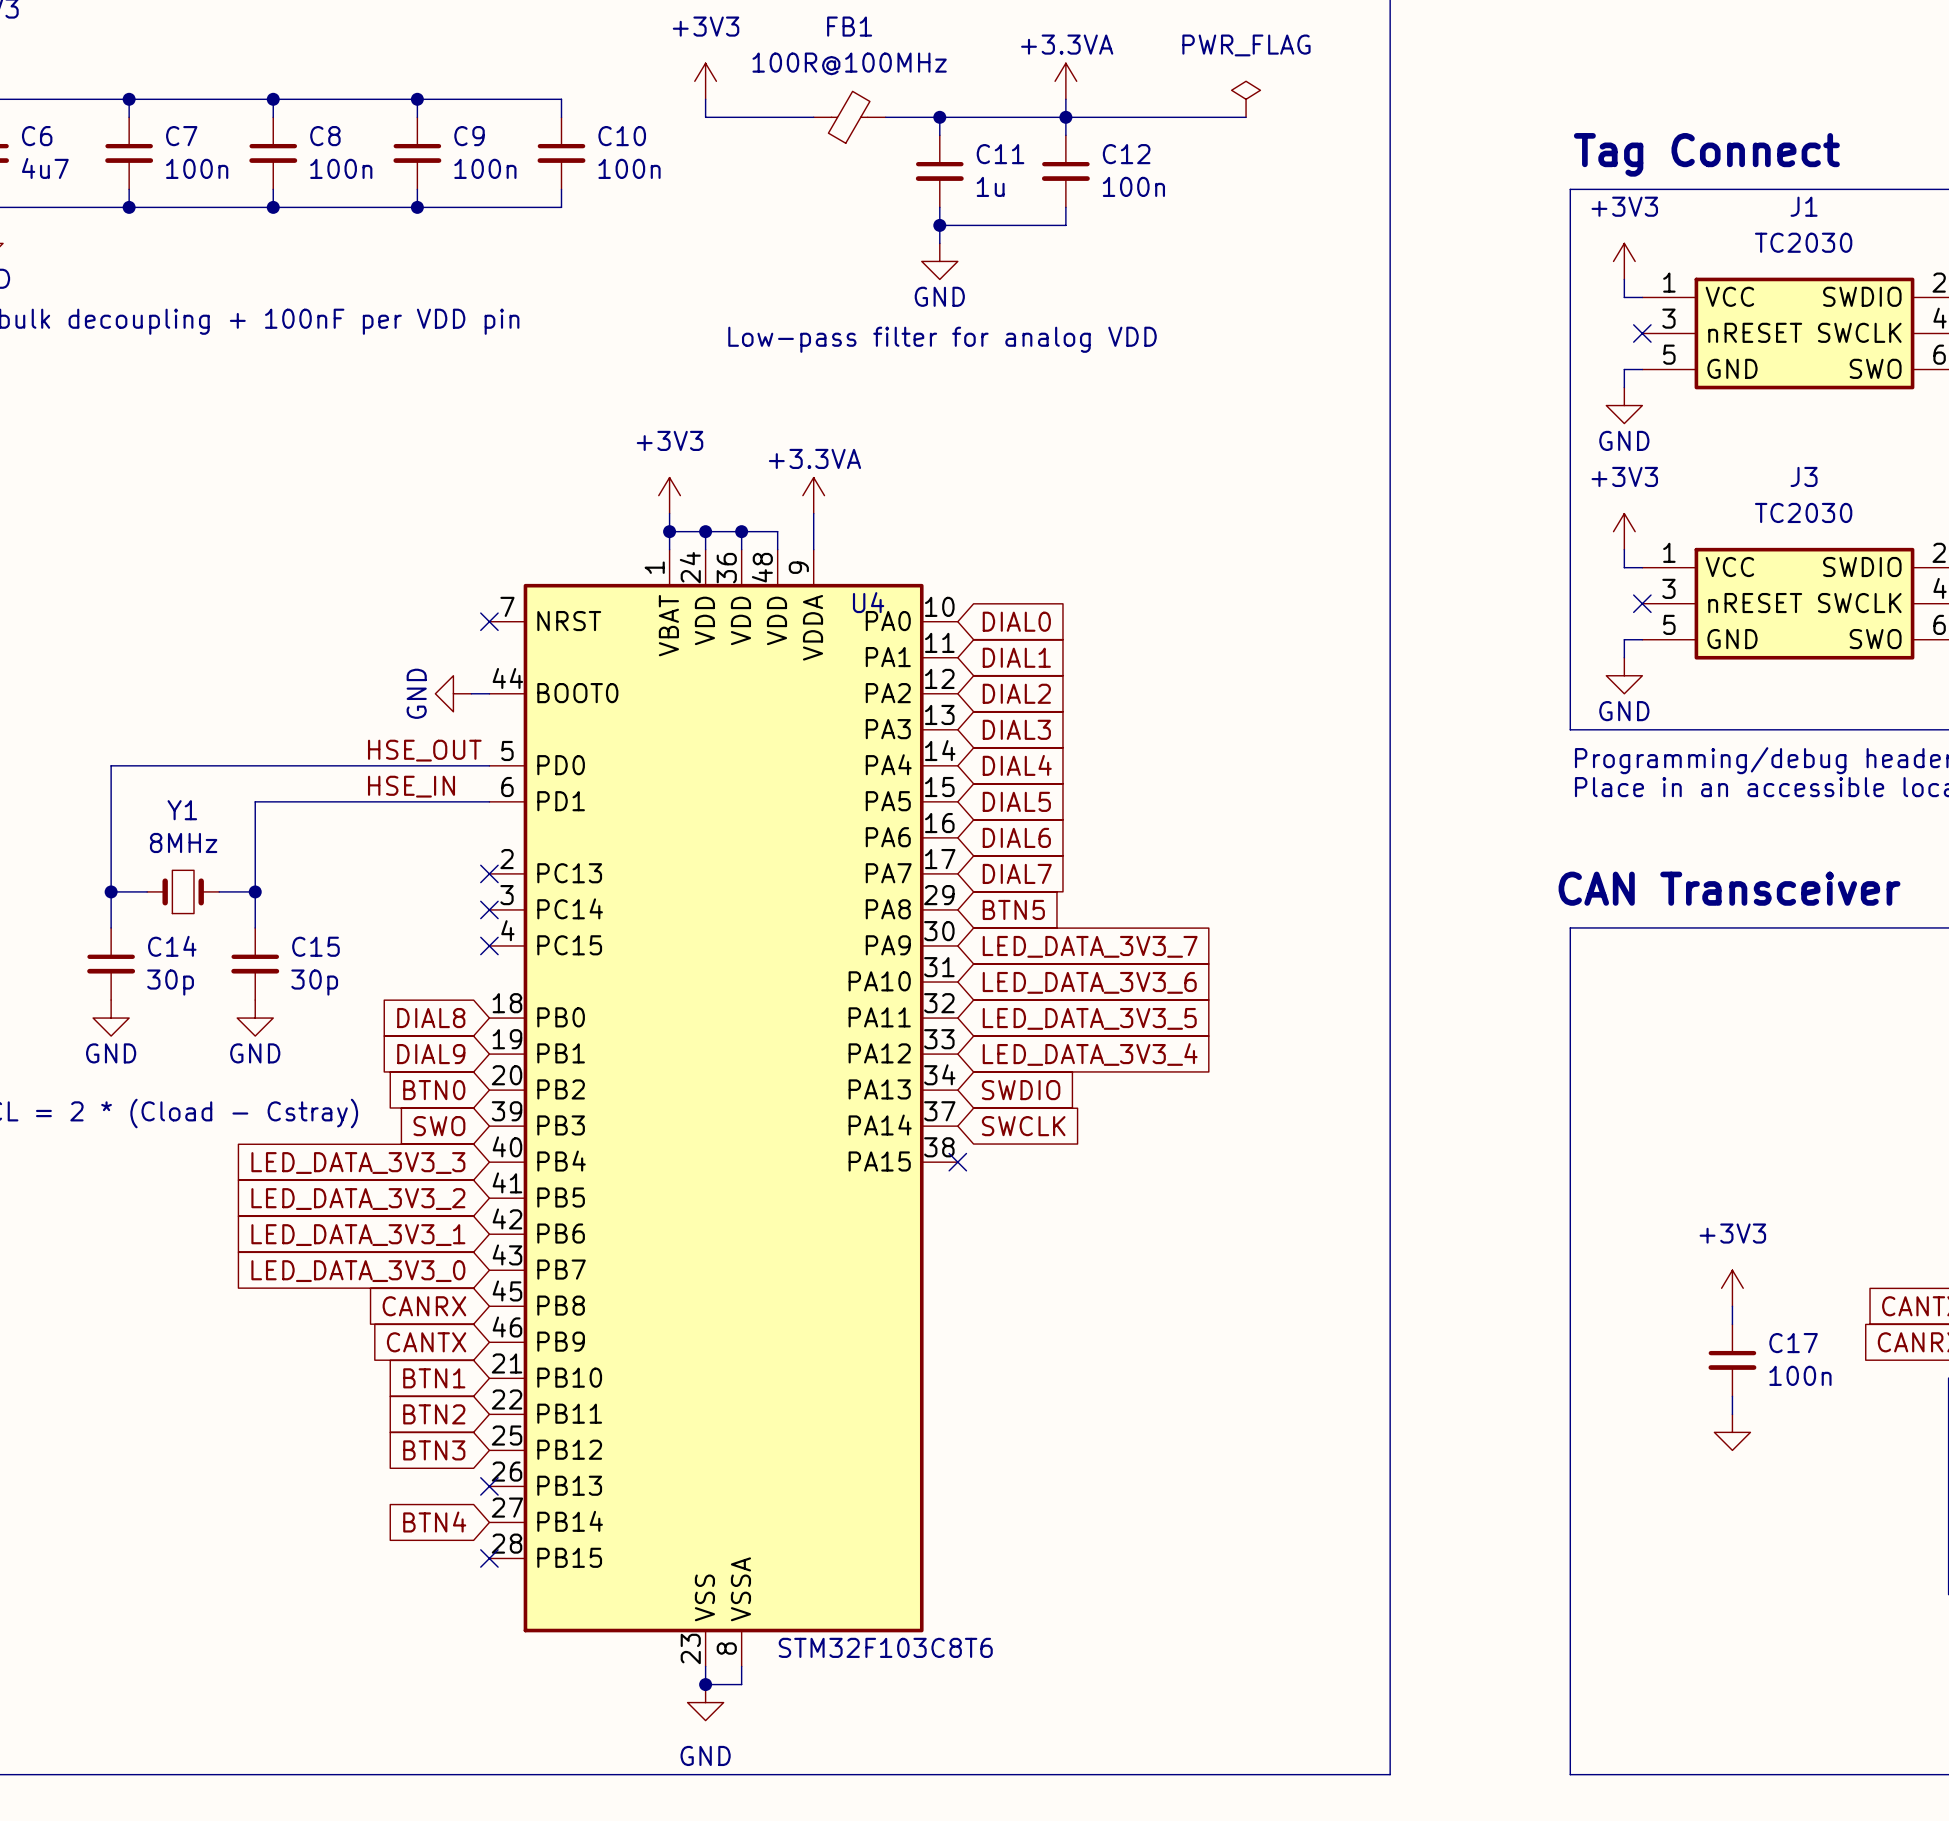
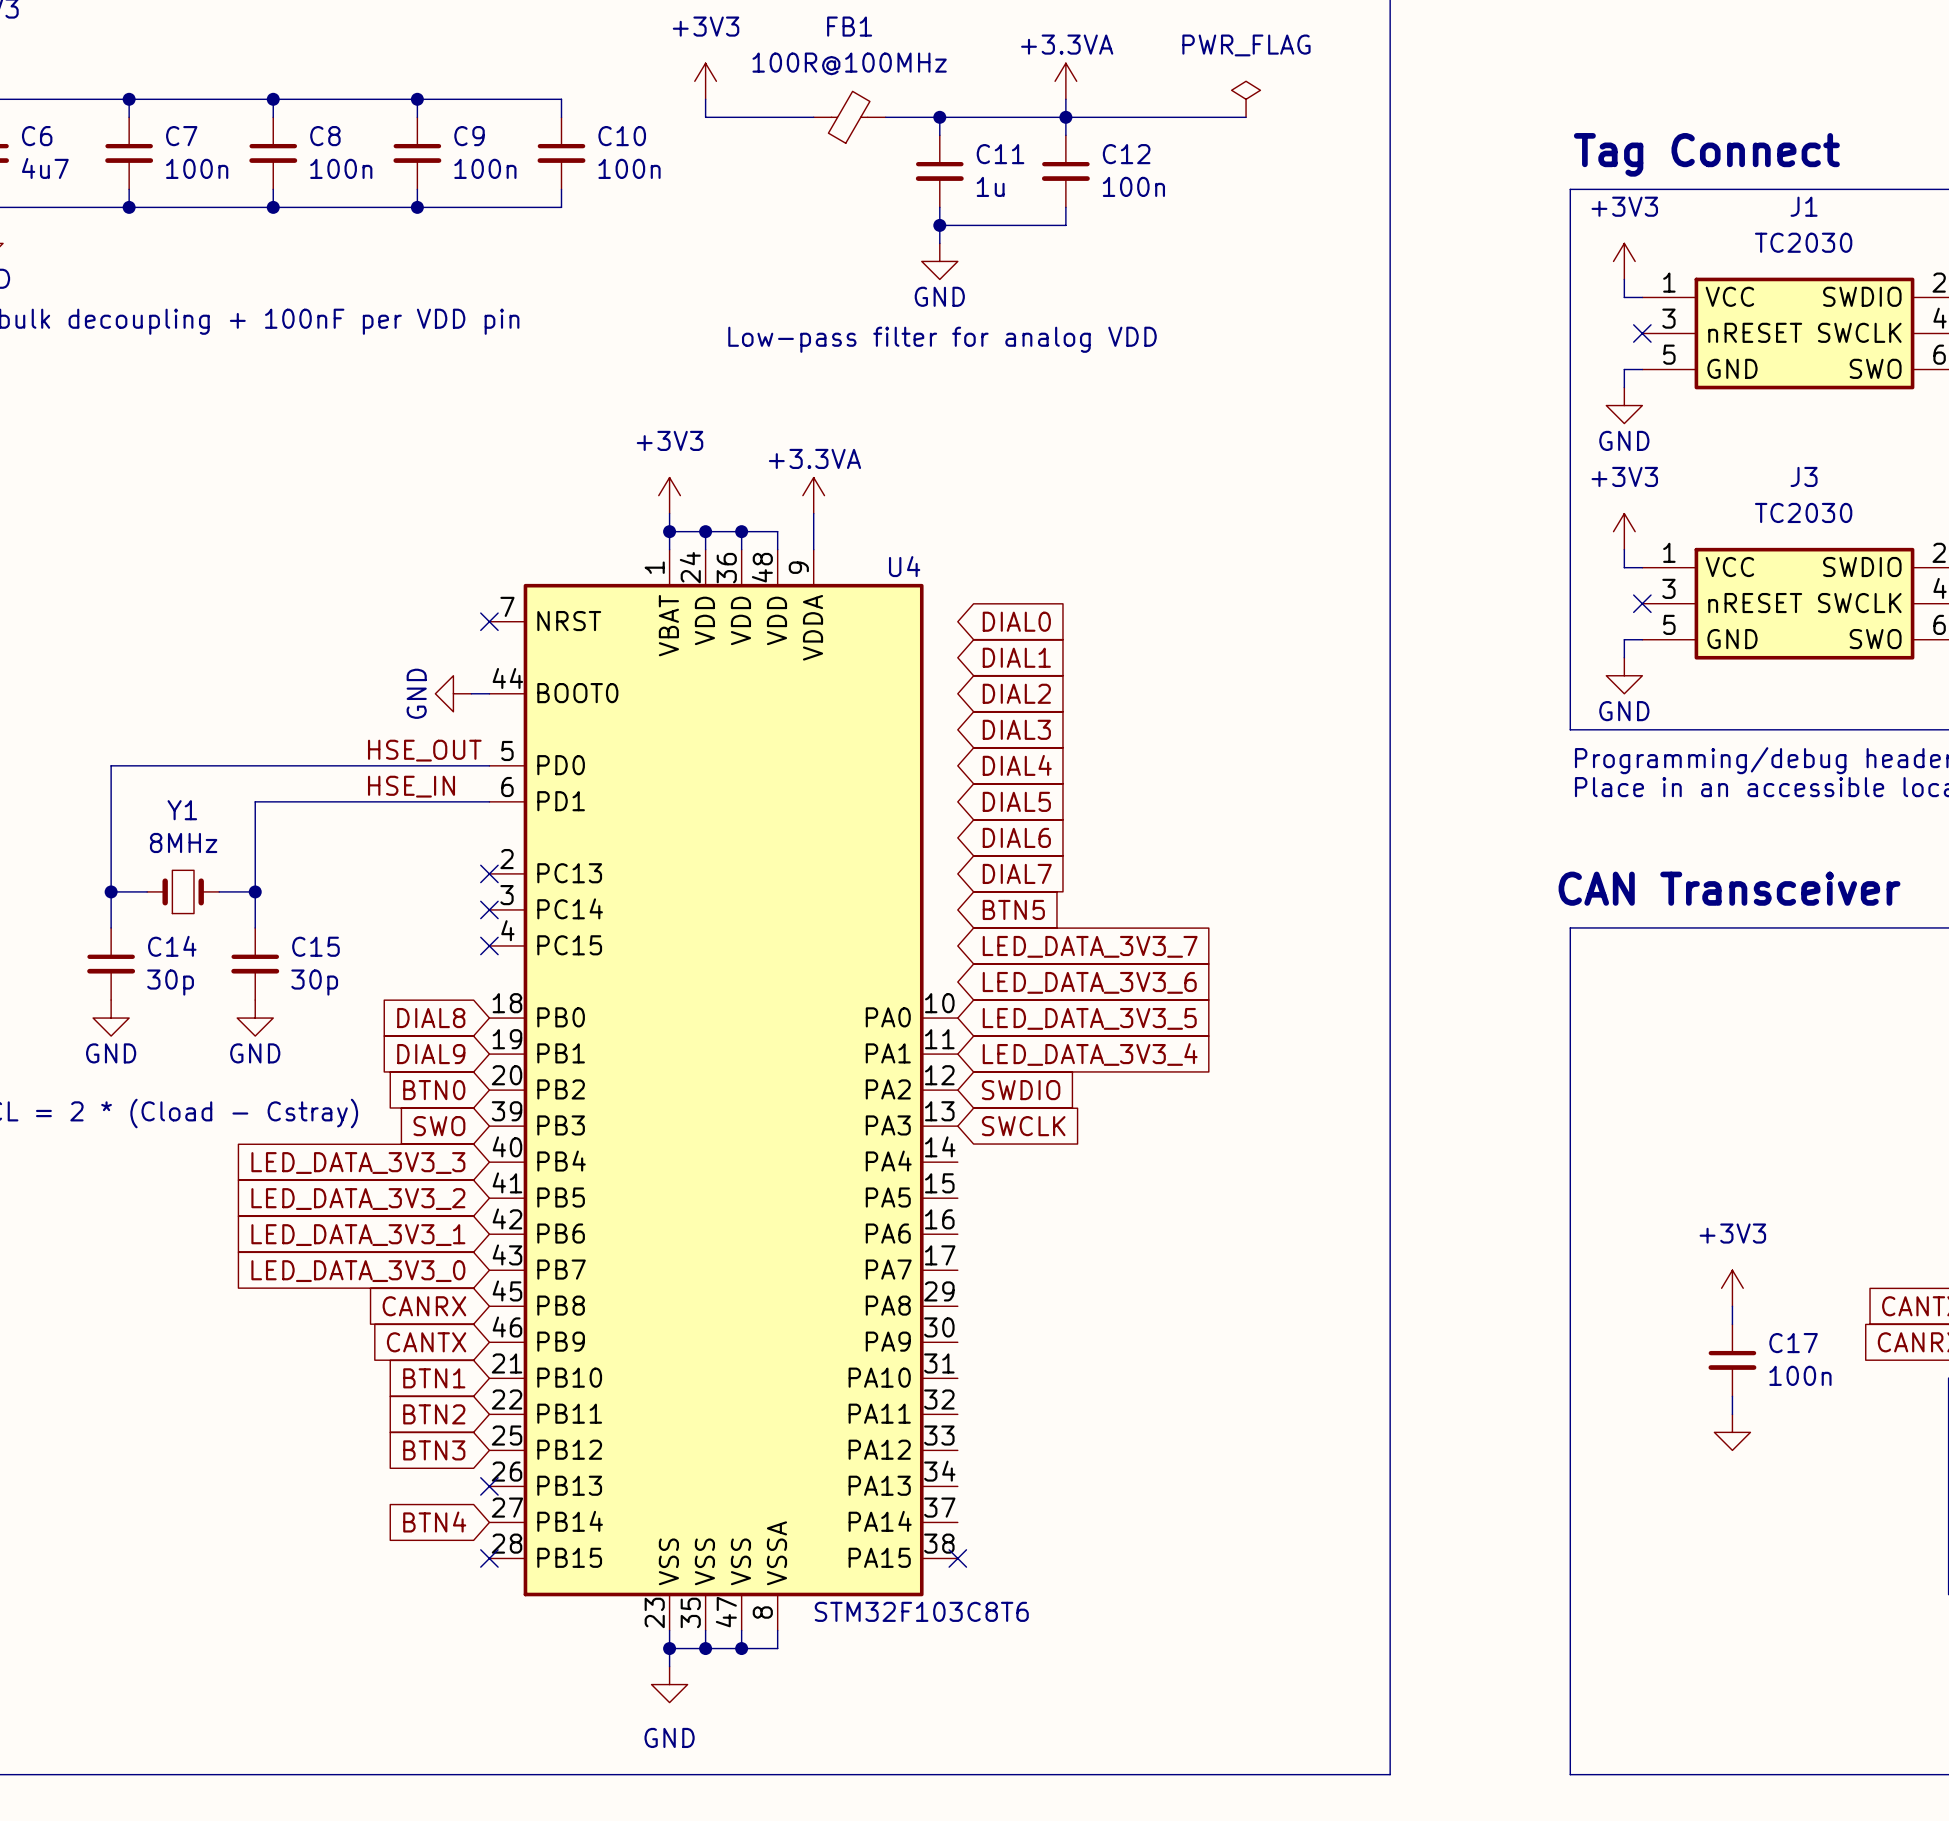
U4 symbol: [489, 549, 958, 1667] -> [489, 549, 958, 1631]
U4 name position: U4 (868, 602) -> U4 (904, 566)
no-connect mark: (957, 1162) -> none
no-connect mark: none -> (957, 1558)
wire: none -> (669, 1630) (669, 1666)
wire: none -> (777, 1630) (777, 1648) (669, 1648)
U4 value position: STM32F103C8T6 (885, 1647) -> STM32F103C8T6 (921, 1611)
junction: none -> (669, 1648)
junction: none -> (705, 1648)
junction: none -> (741, 1648)
wire: (705, 1666) (705, 1684) (741, 1684) (741, 1666) -> none
junction: (705, 1684) -> none
power symbol position: GND (705, 1702) -> GND (669, 1684)

